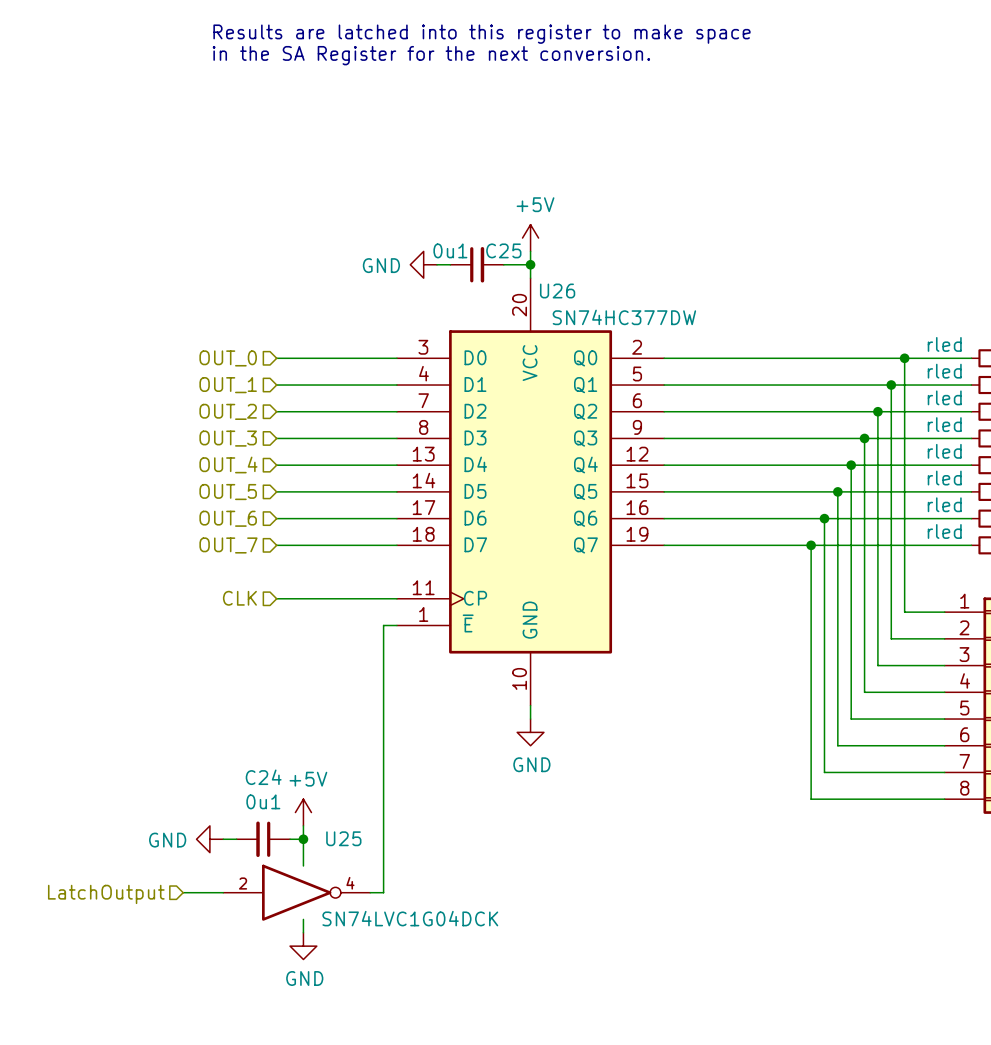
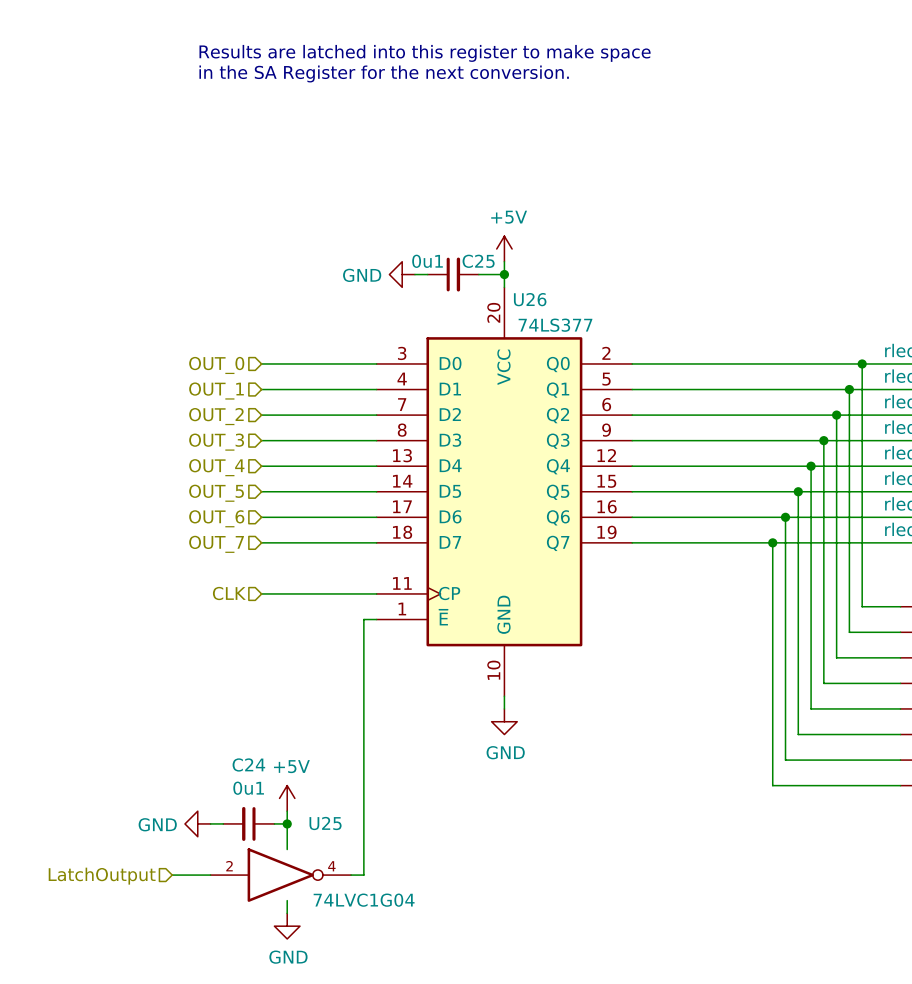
U26 value: SN74HC377DW (624, 317) -> 74LS377 (555, 325)
U25 value: SN74LVC1G04DCK (410, 918) -> 74LVC1G04 (364, 900)

